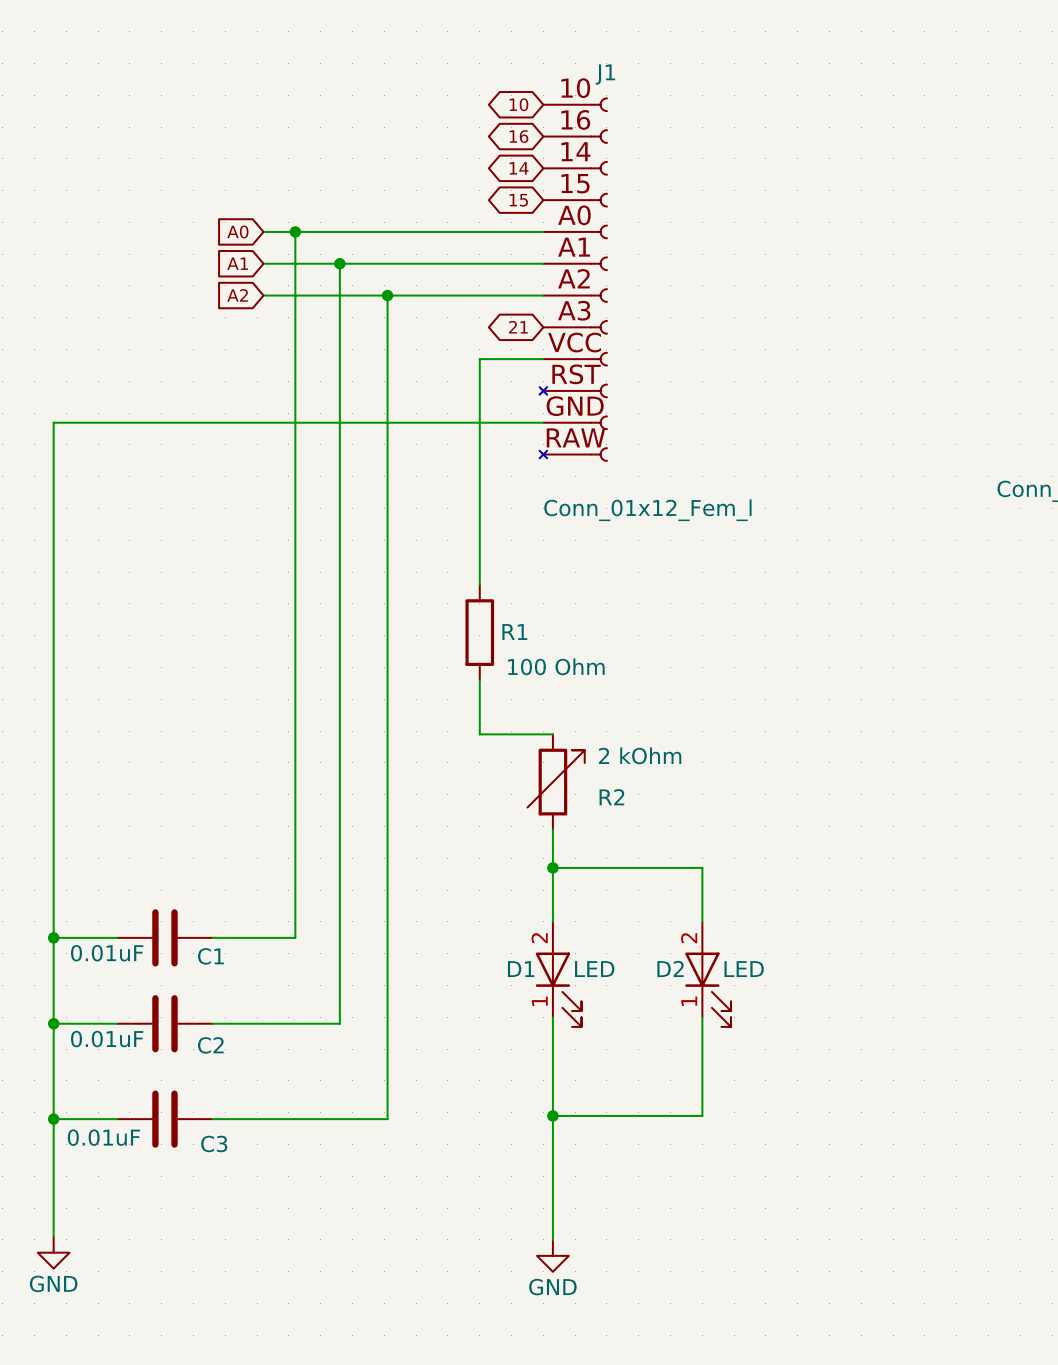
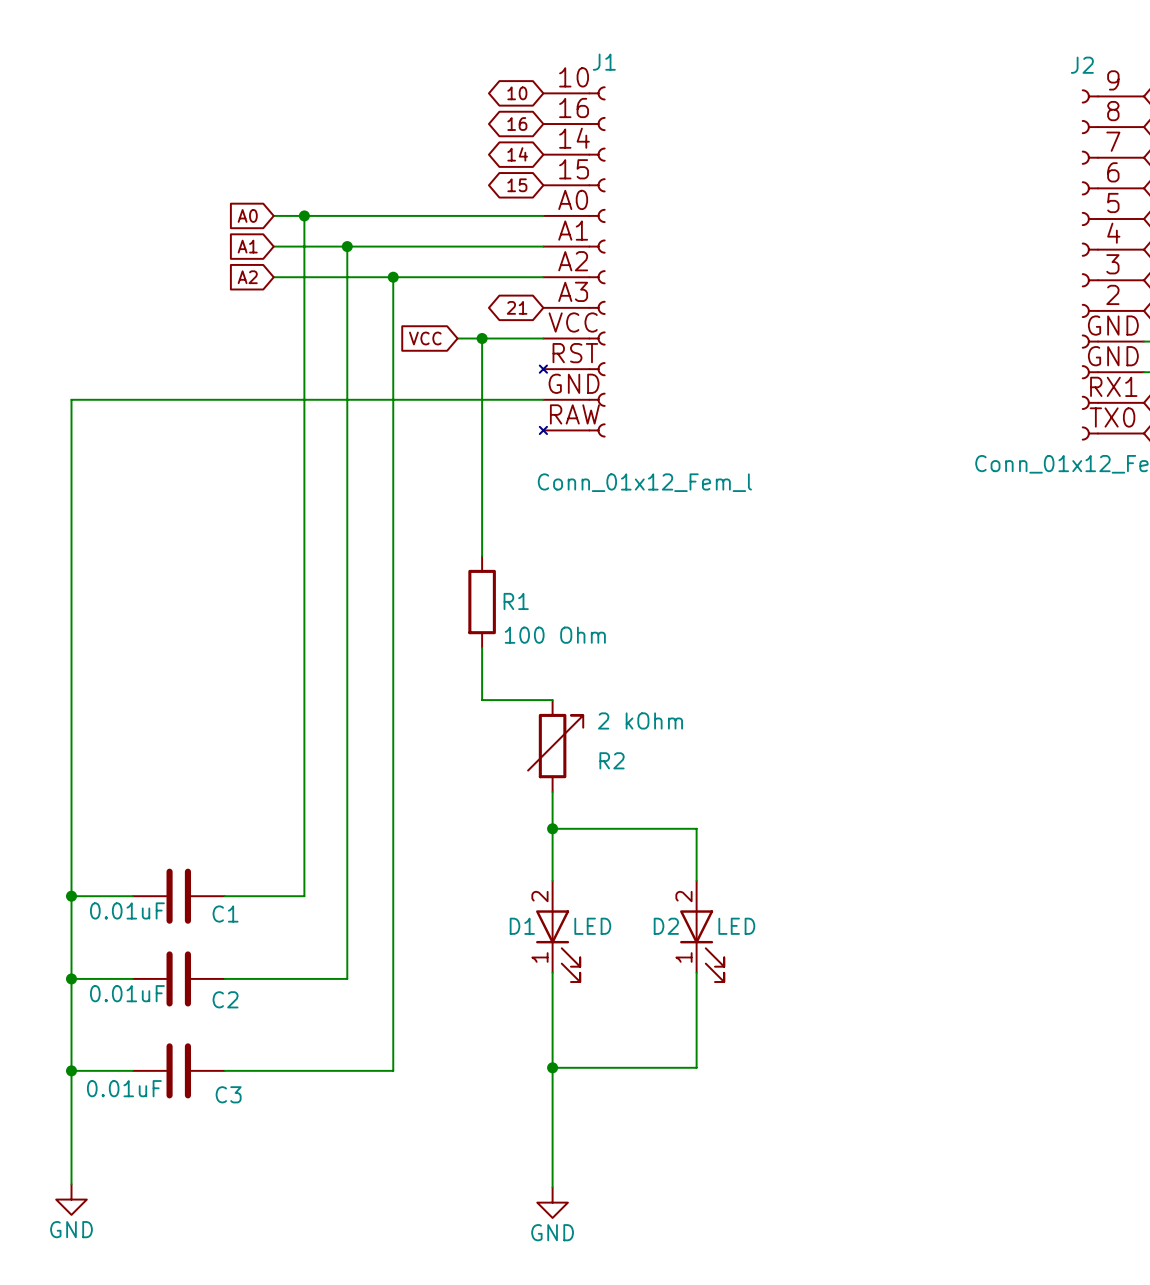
global label: none -> VCC (425, 338)
wire: none -> (457, 338) (482, 338)
junction: none -> (482, 338)

